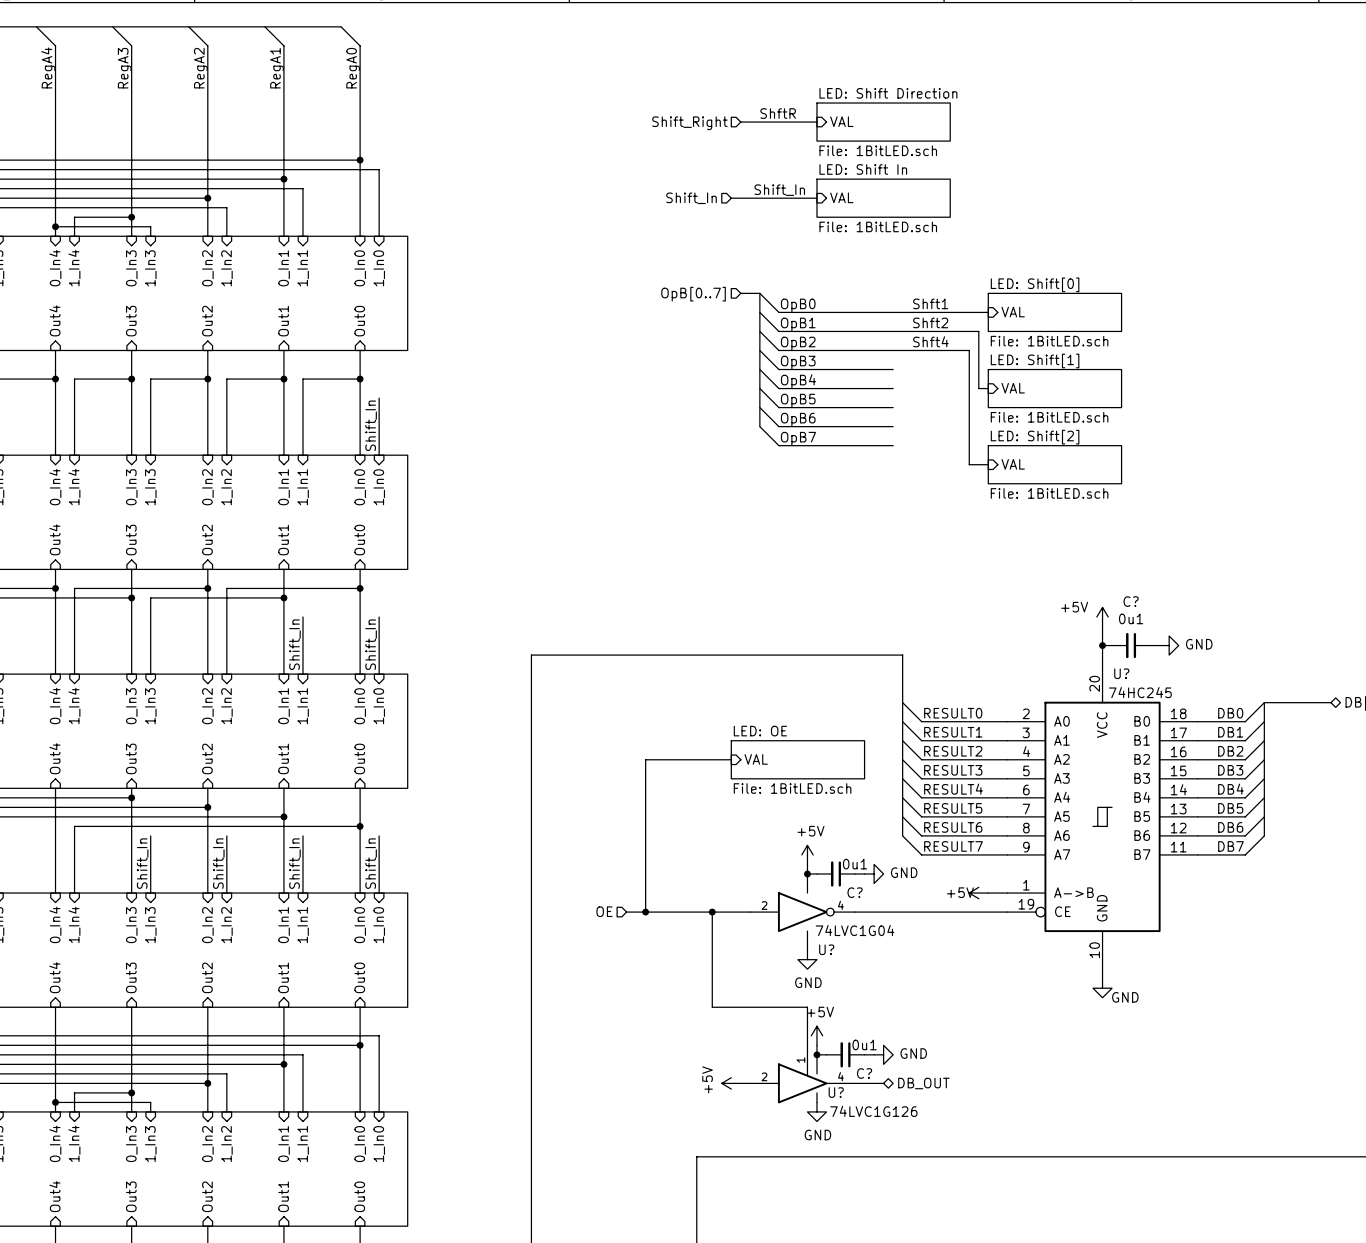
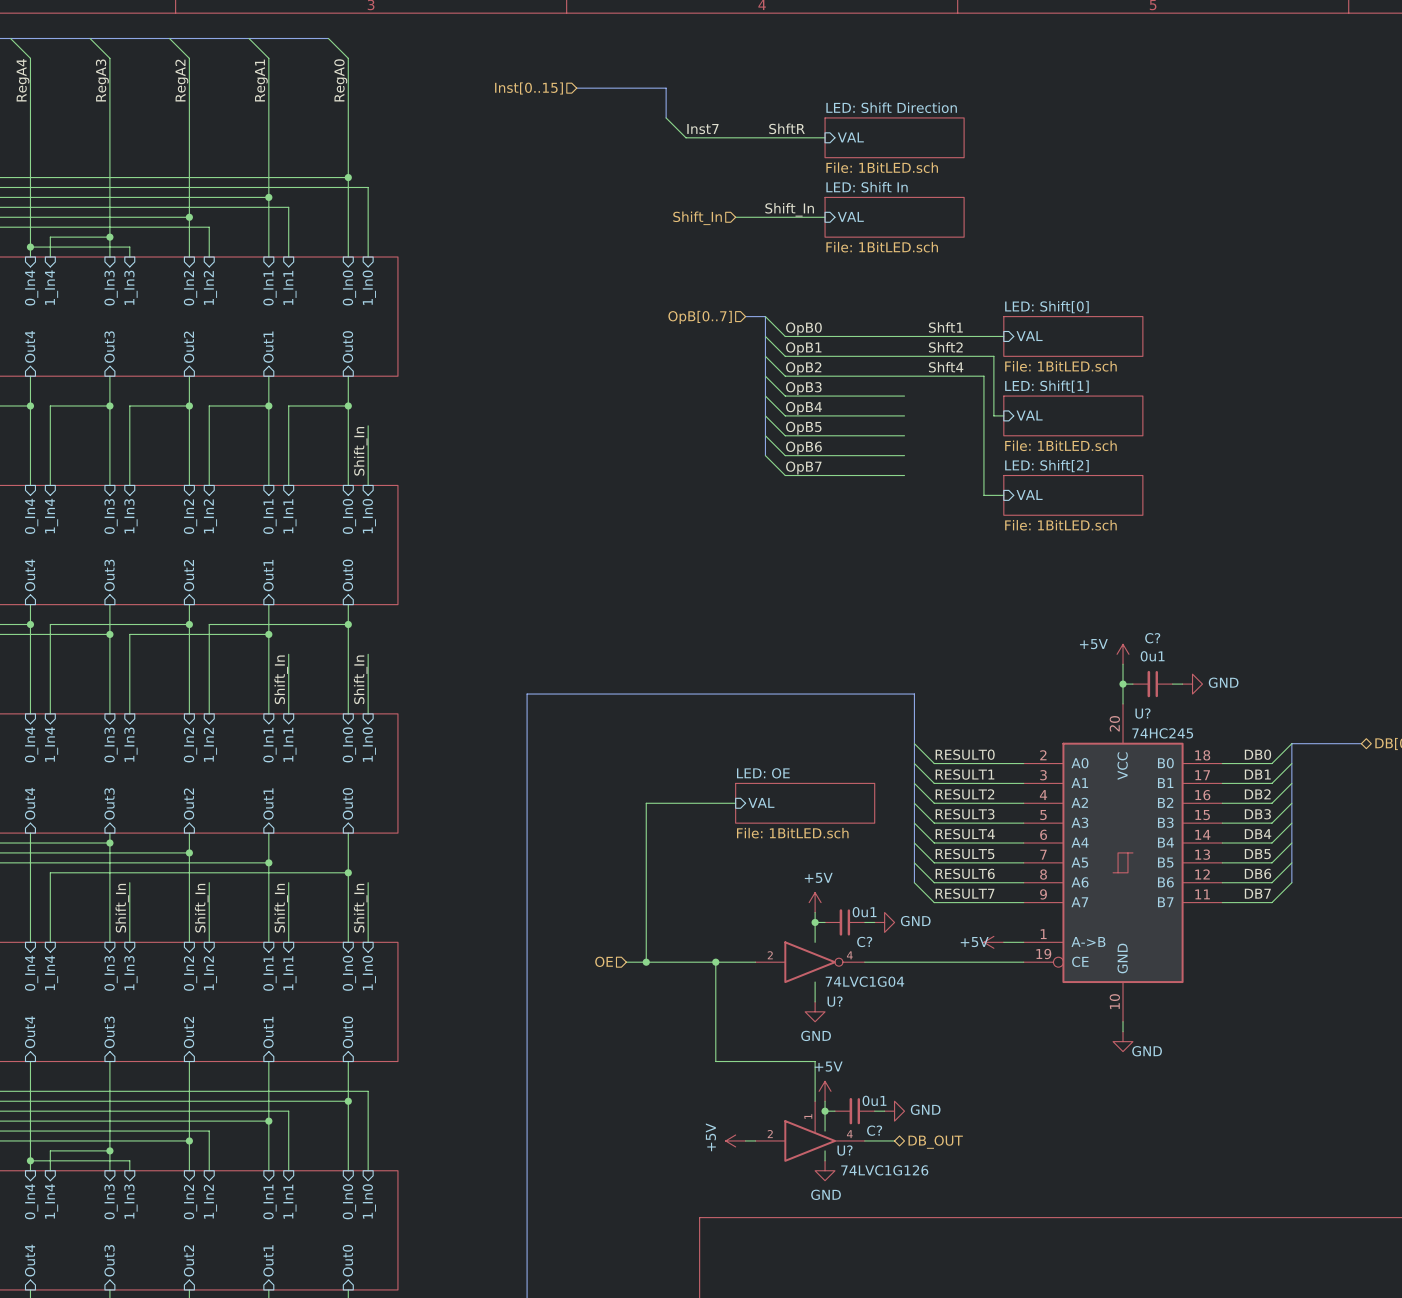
bus: none -> (576, 88) (666, 88) (666, 117)
hierarchical label: none -> Inst[0..15] (529, 88)
wire: none -> (666, 117) (685, 137) (745, 137)
label: none -> Inst7 (702, 129)
hierarchical label: Shift_Right (689, 123) -> none

